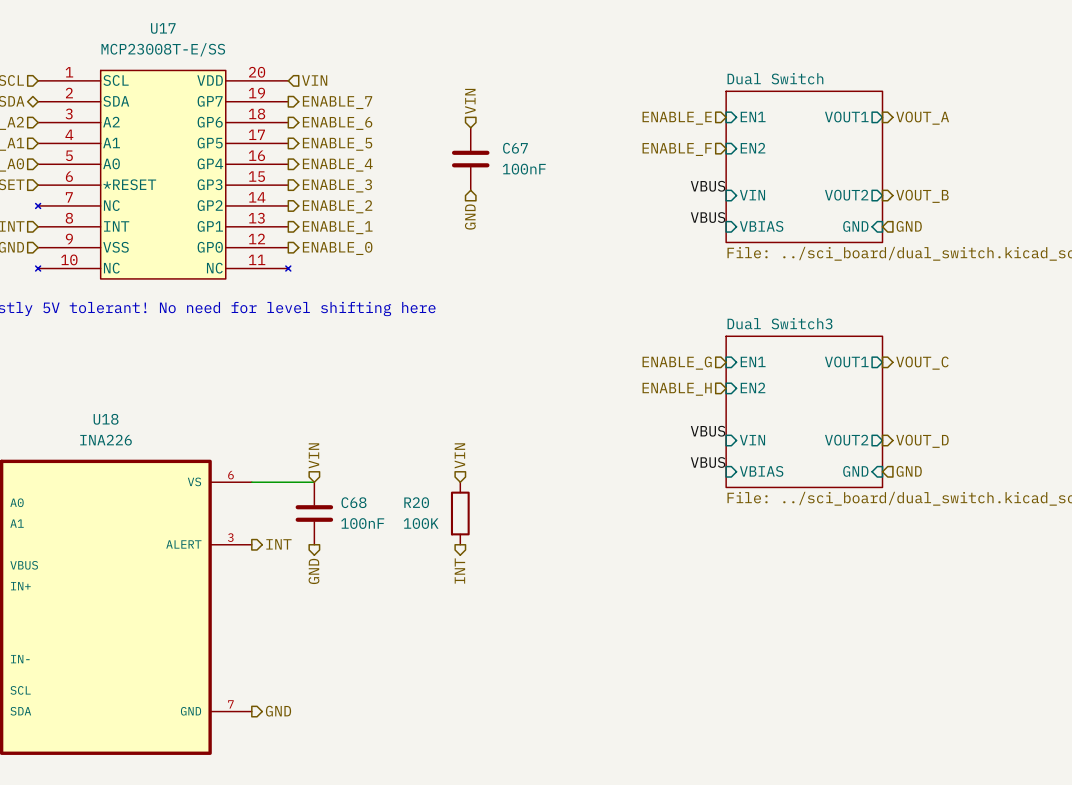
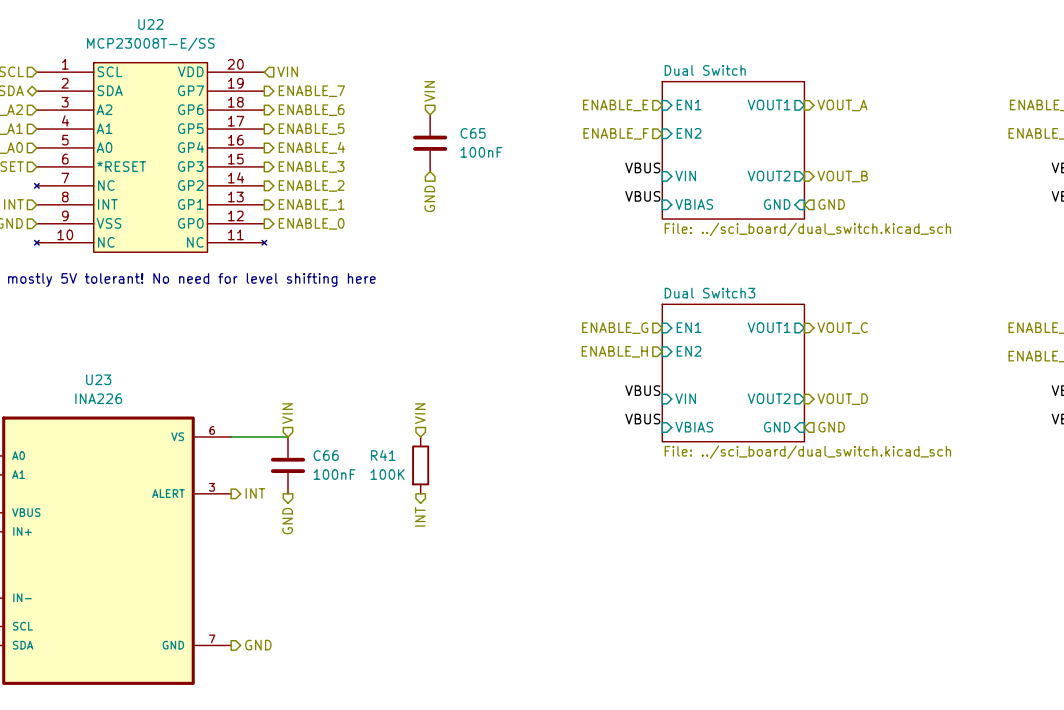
U17 name: U17 (163, 28) -> U22 (150, 24)
C67 name: C67 (515, 148) -> C65 (473, 133)
U18 name: U18 (106, 419) -> U23 (98, 379)
C68 name: C68 (353, 502) -> C66 (326, 455)
R20 name: R20 (416, 502) -> R41 (383, 455)

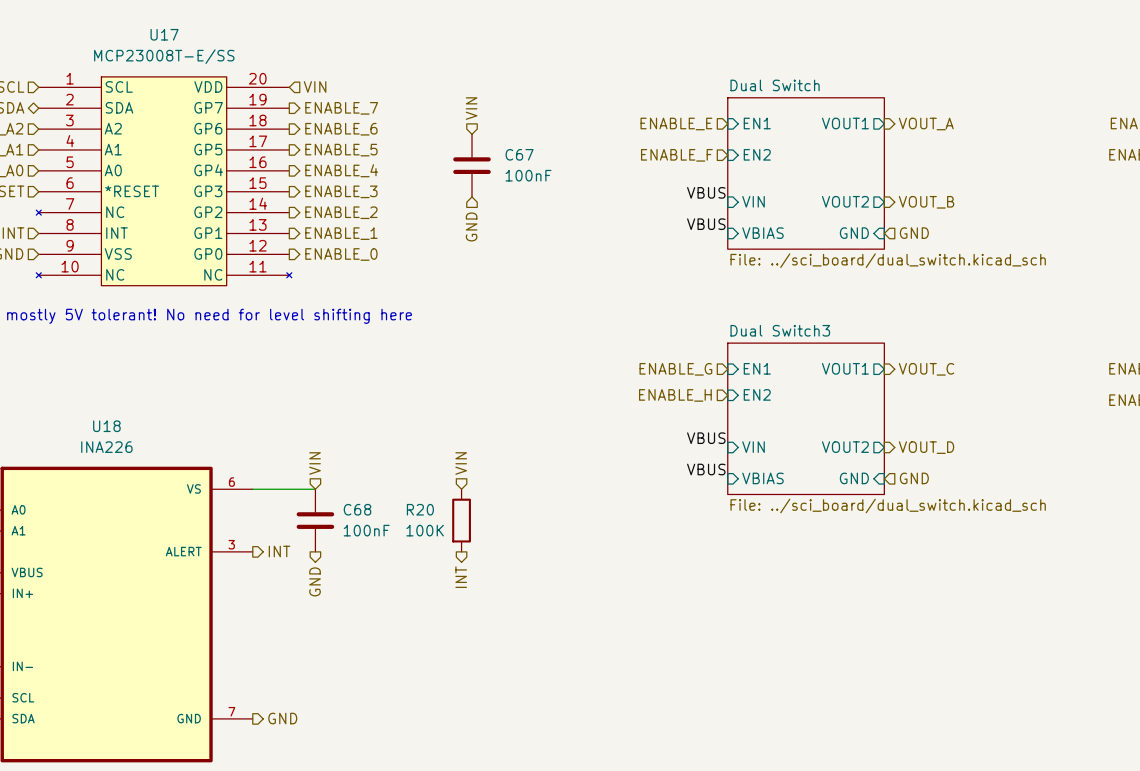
U22 name: U22 (150, 24) -> U17 (164, 34)
C65 name: C65 (473, 133) -> C67 (519, 154)
U23 name: U23 (98, 379) -> U18 (106, 426)
C66 name: C66 (326, 455) -> C68 (357, 509)
R41 name: R41 (383, 455) -> R20 (420, 509)

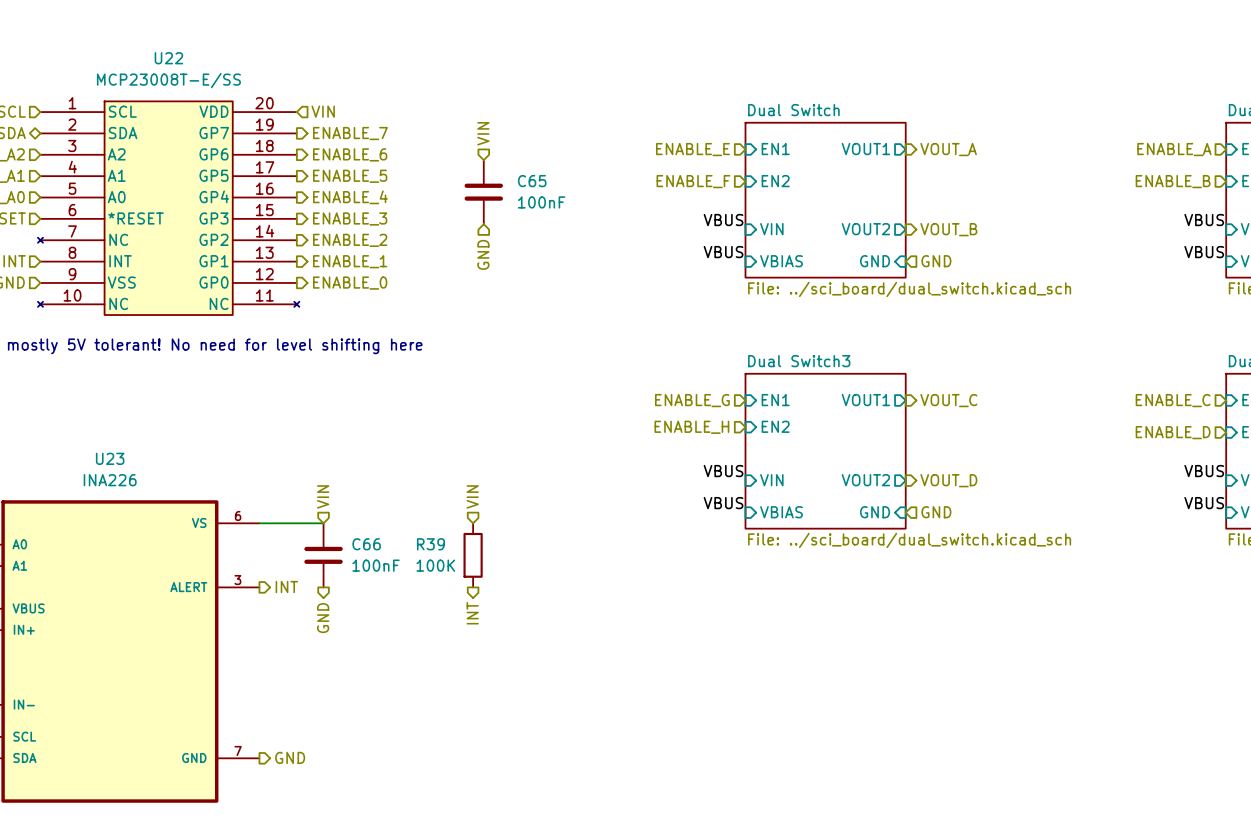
U17 name: U17 (164, 34) -> U22 (168, 58)
C67 name: C67 (519, 154) -> C65 (532, 181)
U18 name: U18 (106, 426) -> U23 (110, 458)
C68 name: C68 (357, 509) -> C66 (366, 544)
R20 name: R20 (420, 509) -> R39 (430, 544)

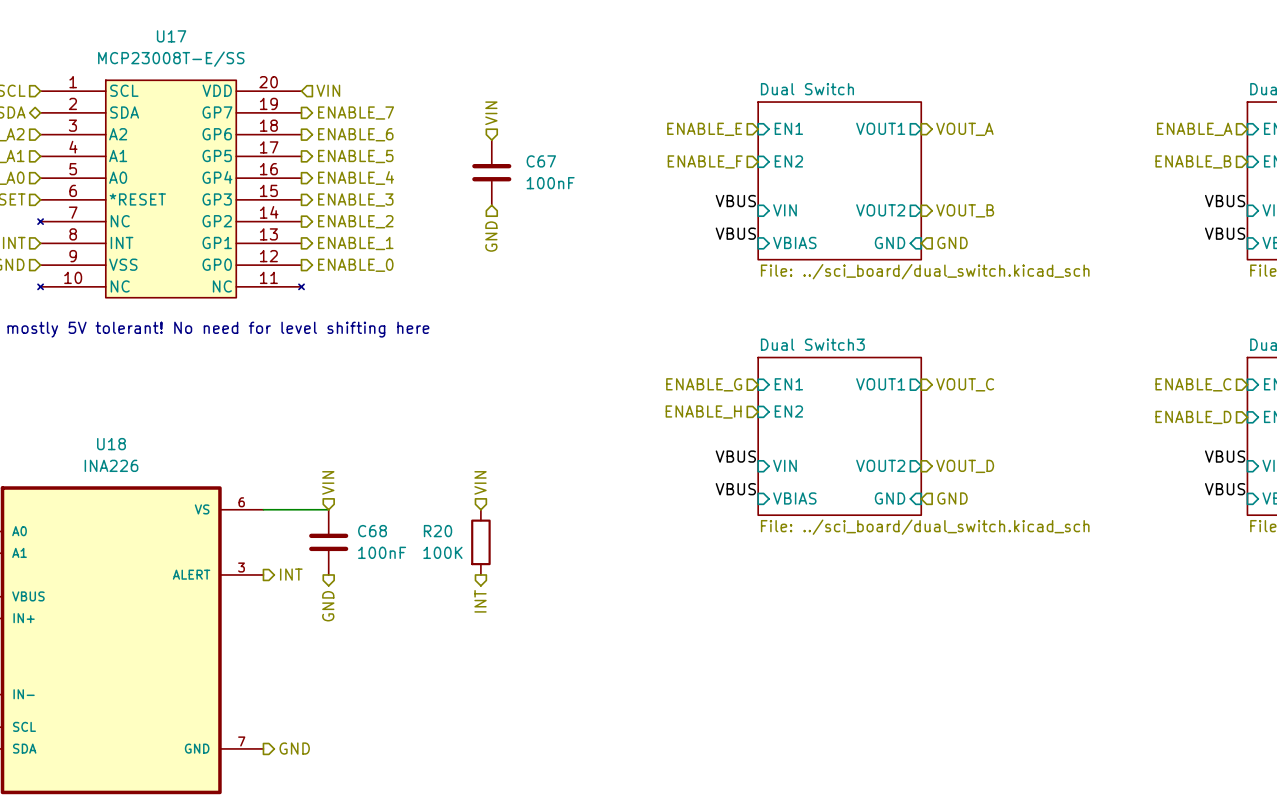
U22 name: U22 (168, 58) -> U17 (171, 36)
C65 name: C65 (532, 181) -> C67 (541, 161)
U23 name: U23 (110, 458) -> U18 (111, 444)
C66 name: C66 (366, 544) -> C68 (372, 531)
R39 name: R39 (430, 544) -> R20 (438, 531)

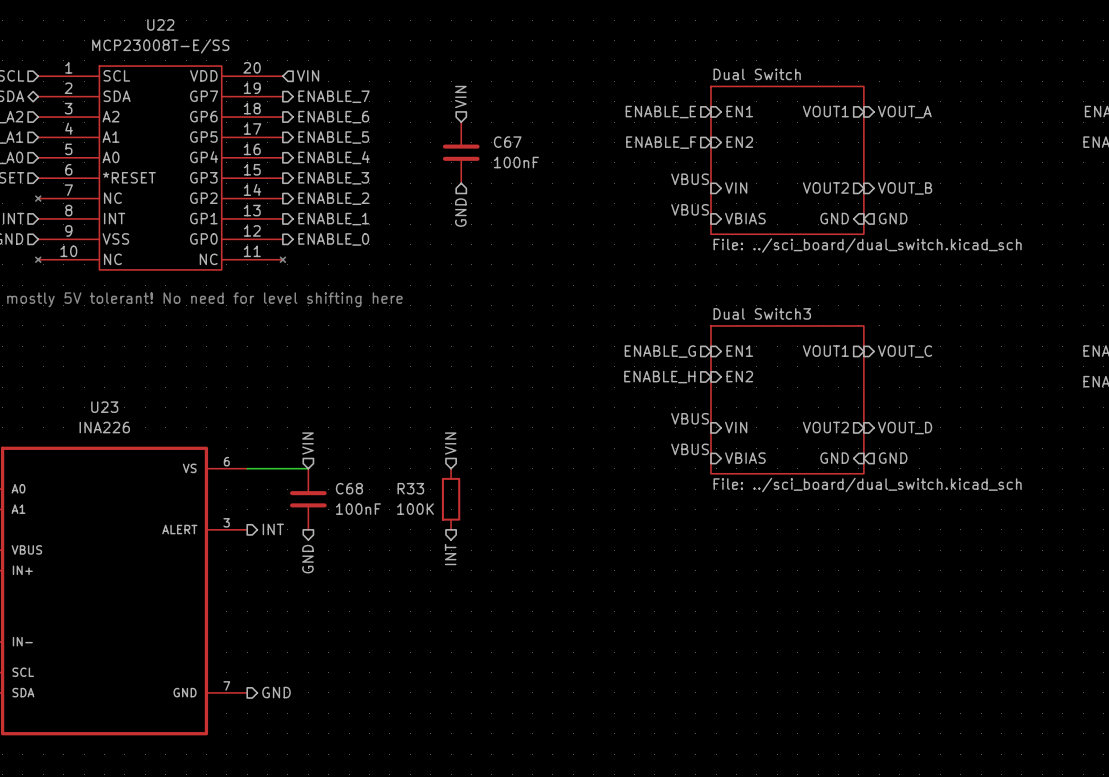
U17 name: U17 (171, 36) -> U22 (160, 24)
U18 name: U18 (111, 444) -> U23 (104, 407)
R20 name: R20 (438, 531) -> R33 (410, 488)

